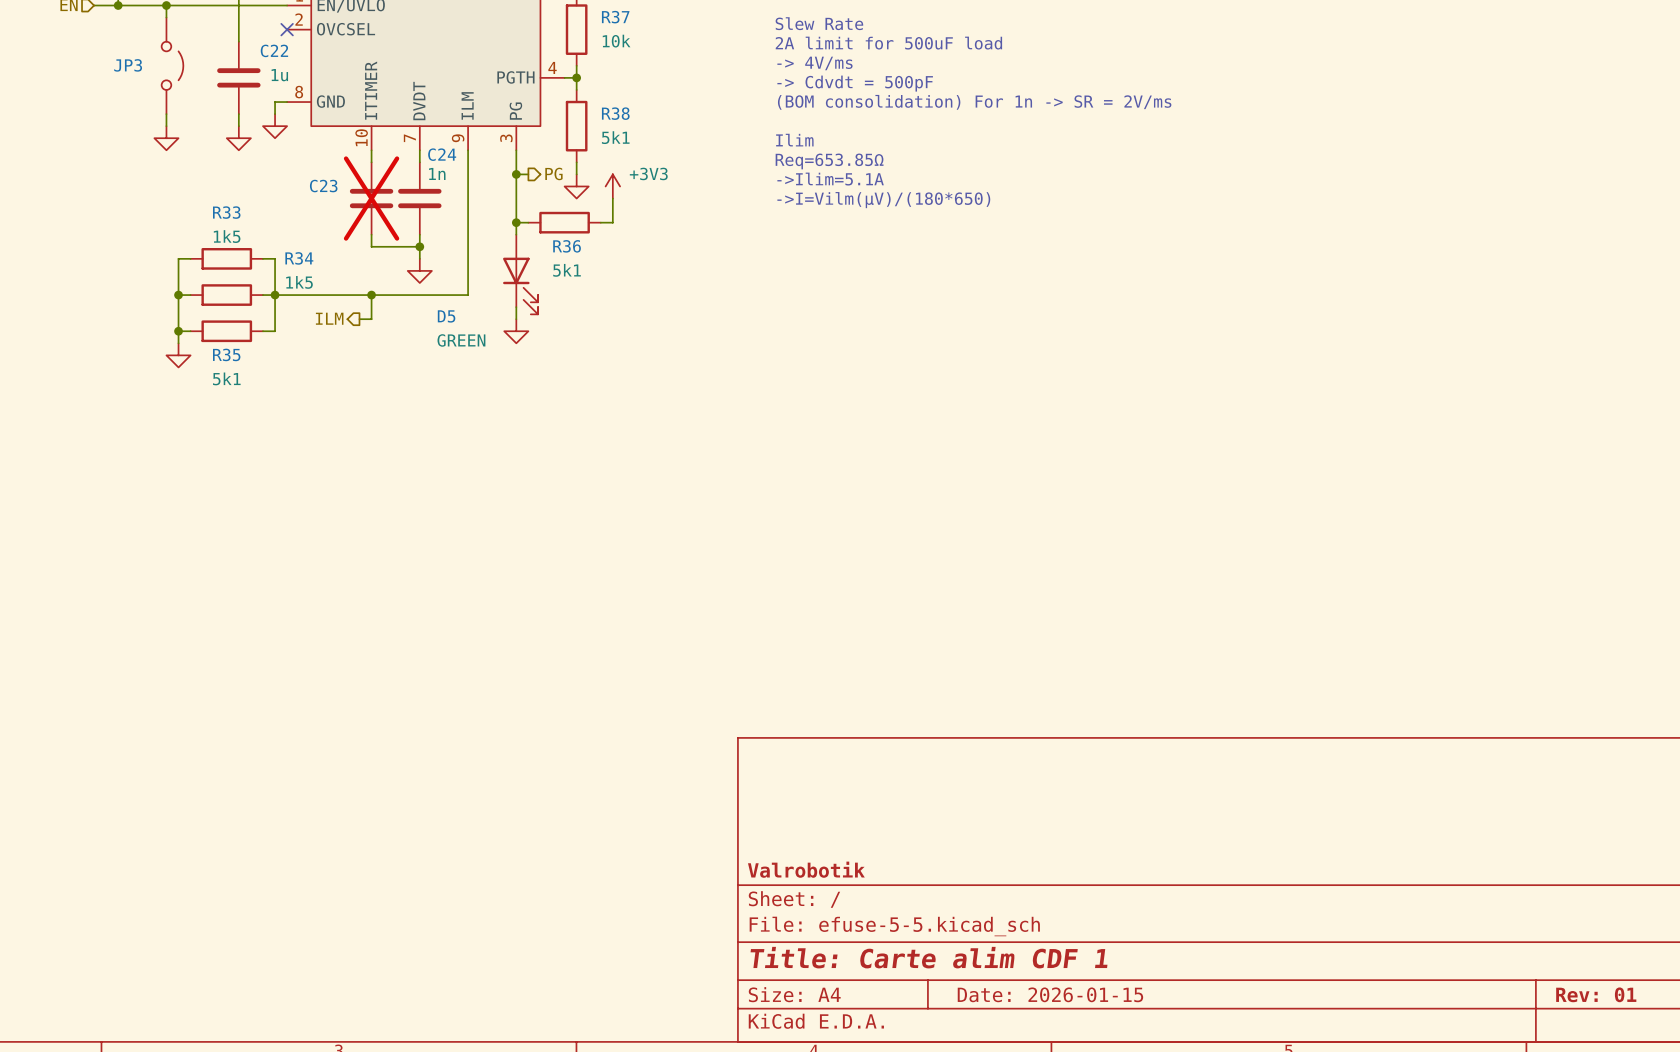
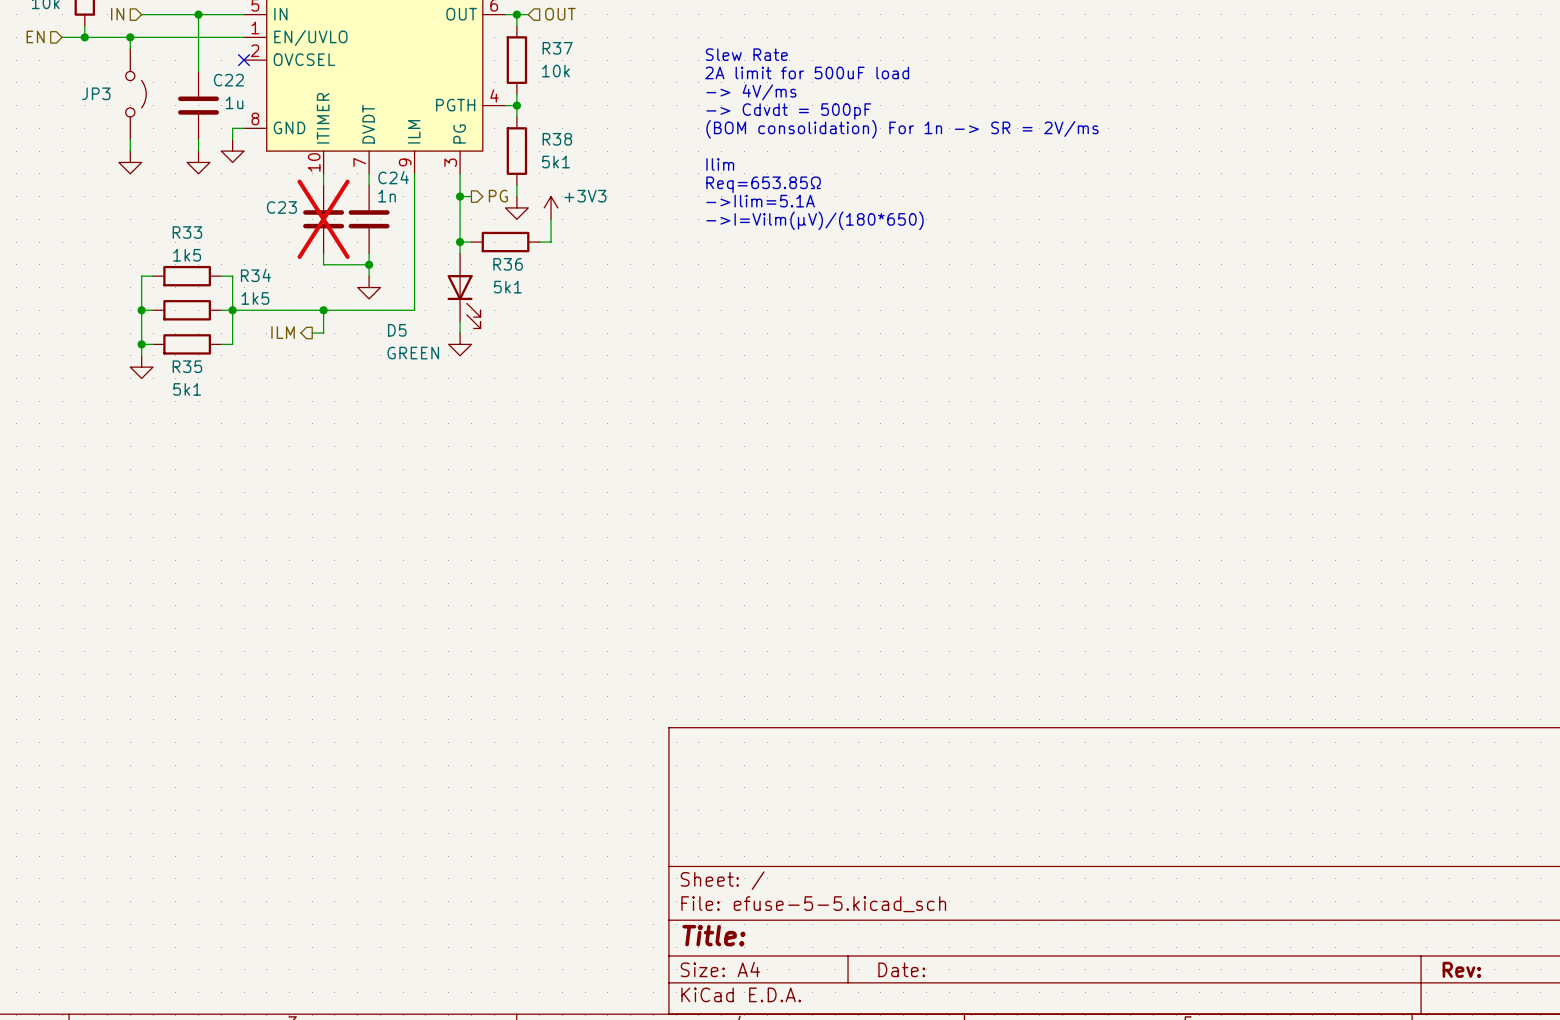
title block: Valrobotik (806, 869) -> none
title block: Title: Carte alim CDF 1 (929, 957) -> Title: (713, 935)
title block: Date: 2026-01-15 (1050, 994) -> Date: (901, 969)
title block: Rev: 01 (1596, 994) -> Rev: (1461, 969)

